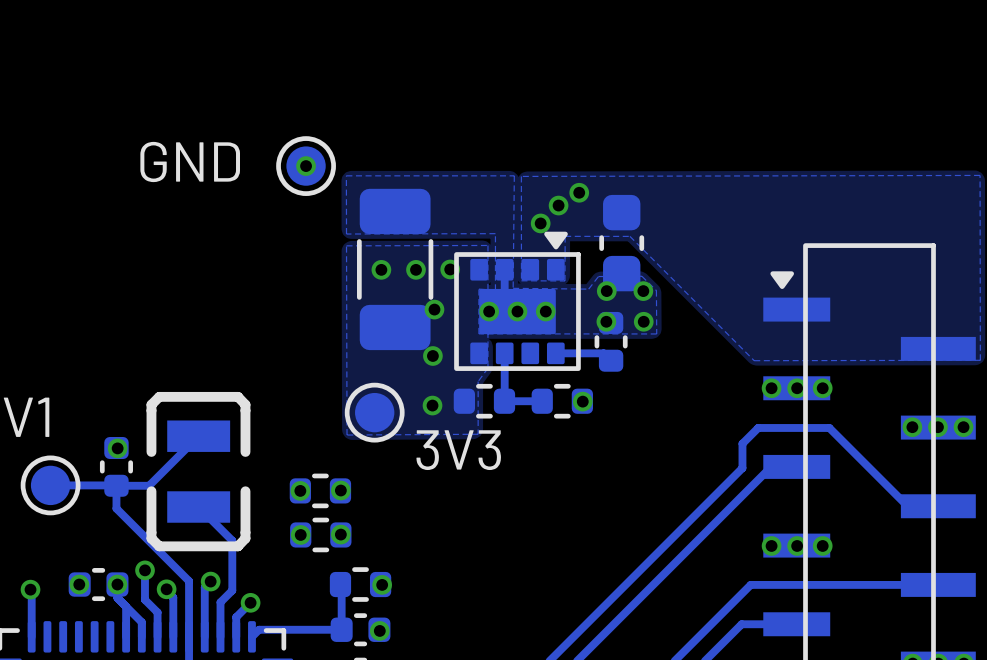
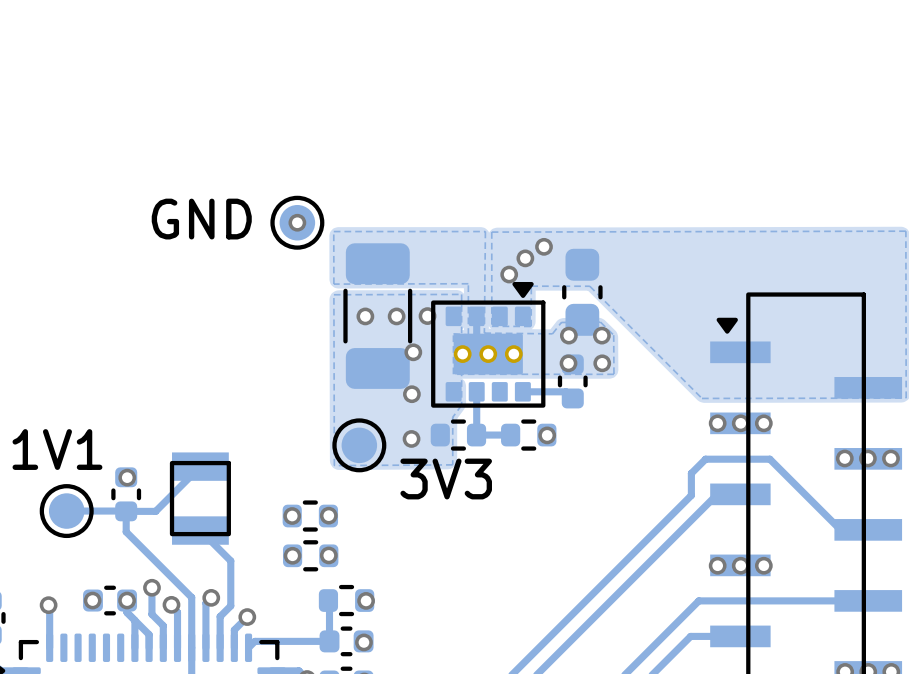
part footprint: [146, 391, 251, 552] -> [169, 452, 231, 545]

